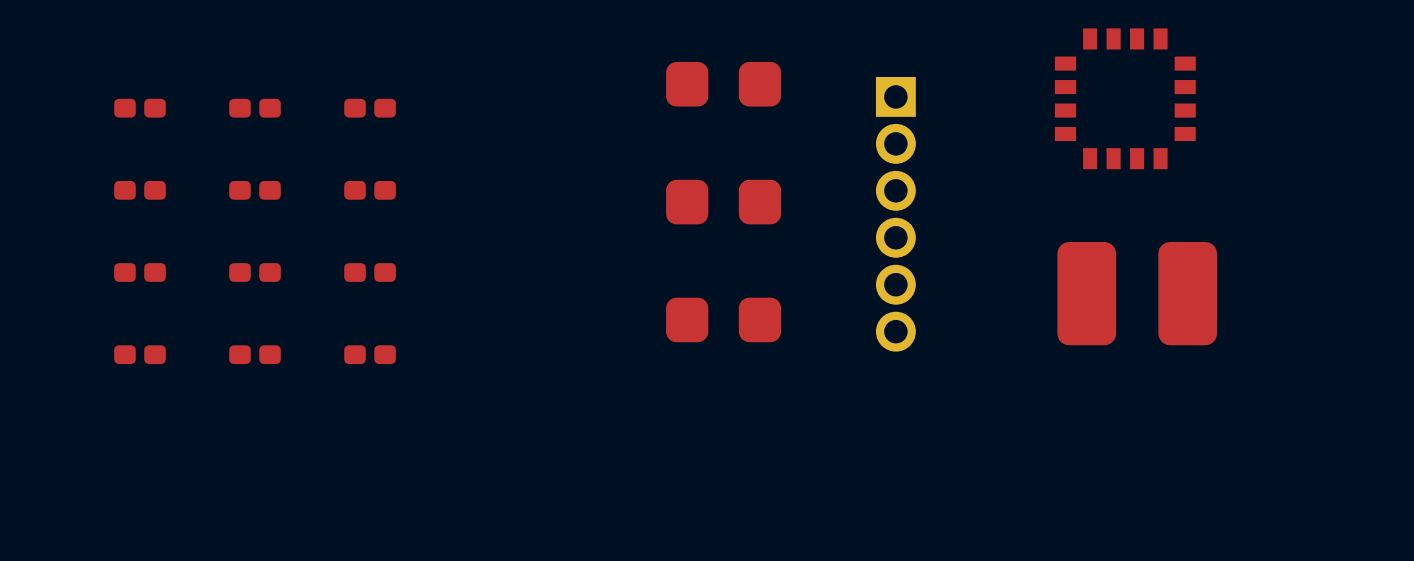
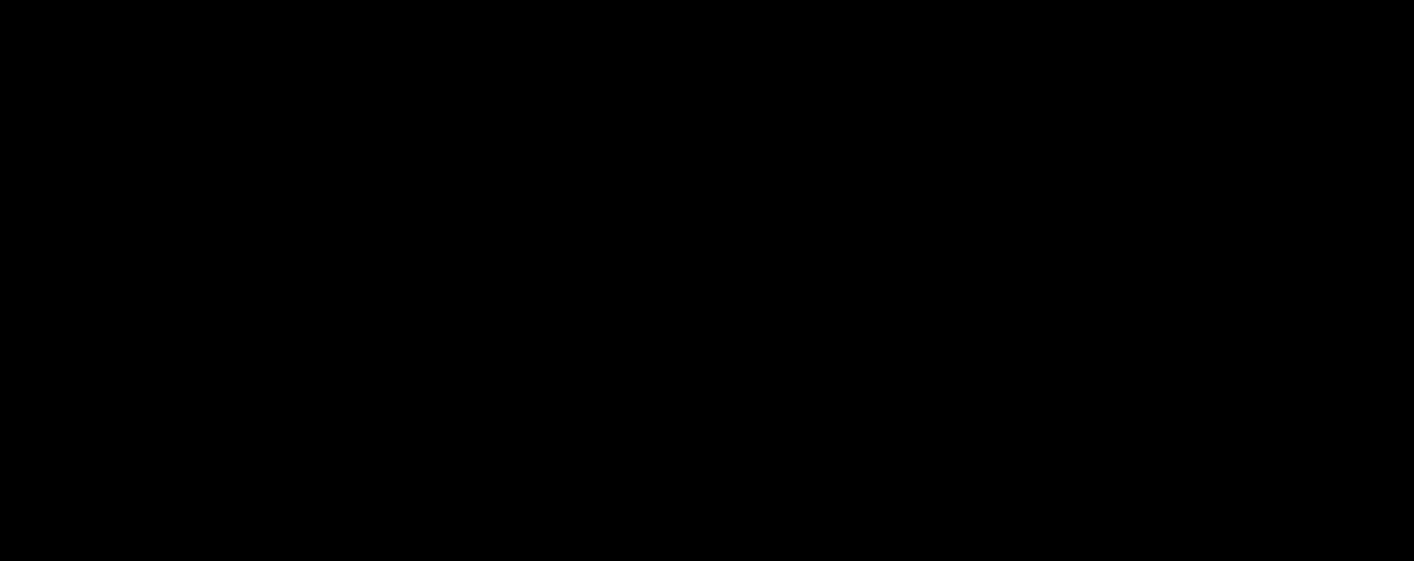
part: (723, 84) -> none
part: (1125, 98) -> none
part: (139, 108) -> none
part: (255, 108) -> none
part: (370, 108) -> none
part: (139, 190) -> none
part: (255, 190) -> none
part: (370, 190) -> none
part: (723, 202) -> none
part: (895, 214) -> none
part: (139, 272) -> none
part: (255, 272) -> none
part: (370, 272) -> none
part: (1137, 293) -> none
part: (723, 319) -> none
part: (139, 354) -> none
part: (255, 354) -> none
part: (370, 354) -> none

